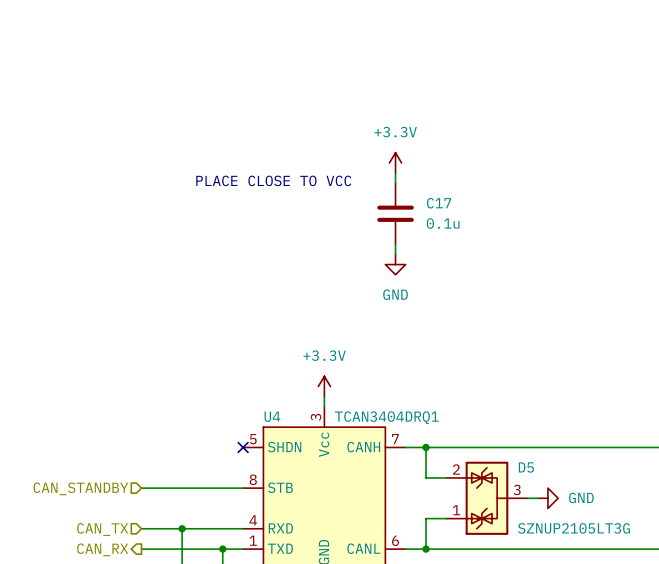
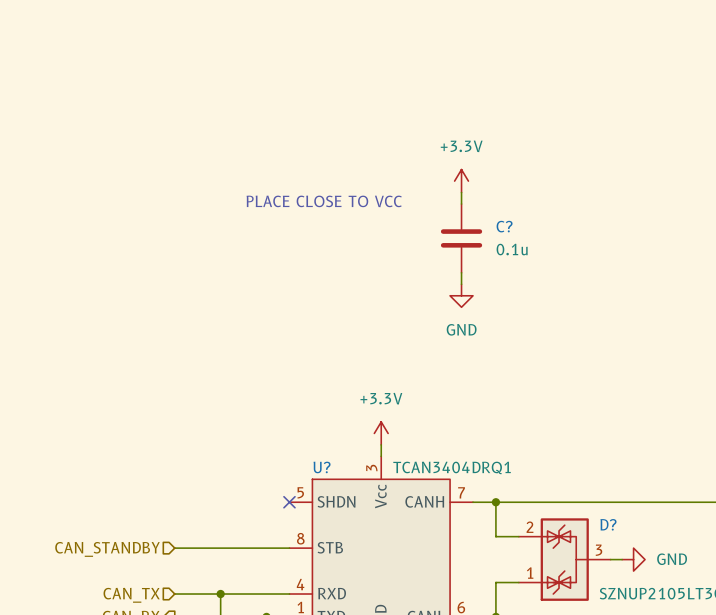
C17 name: C17 (439, 203) -> C? (504, 226)
U4 name: U4 (272, 416) -> U? (322, 467)
D5 name: D5 (526, 467) -> D? (608, 524)

